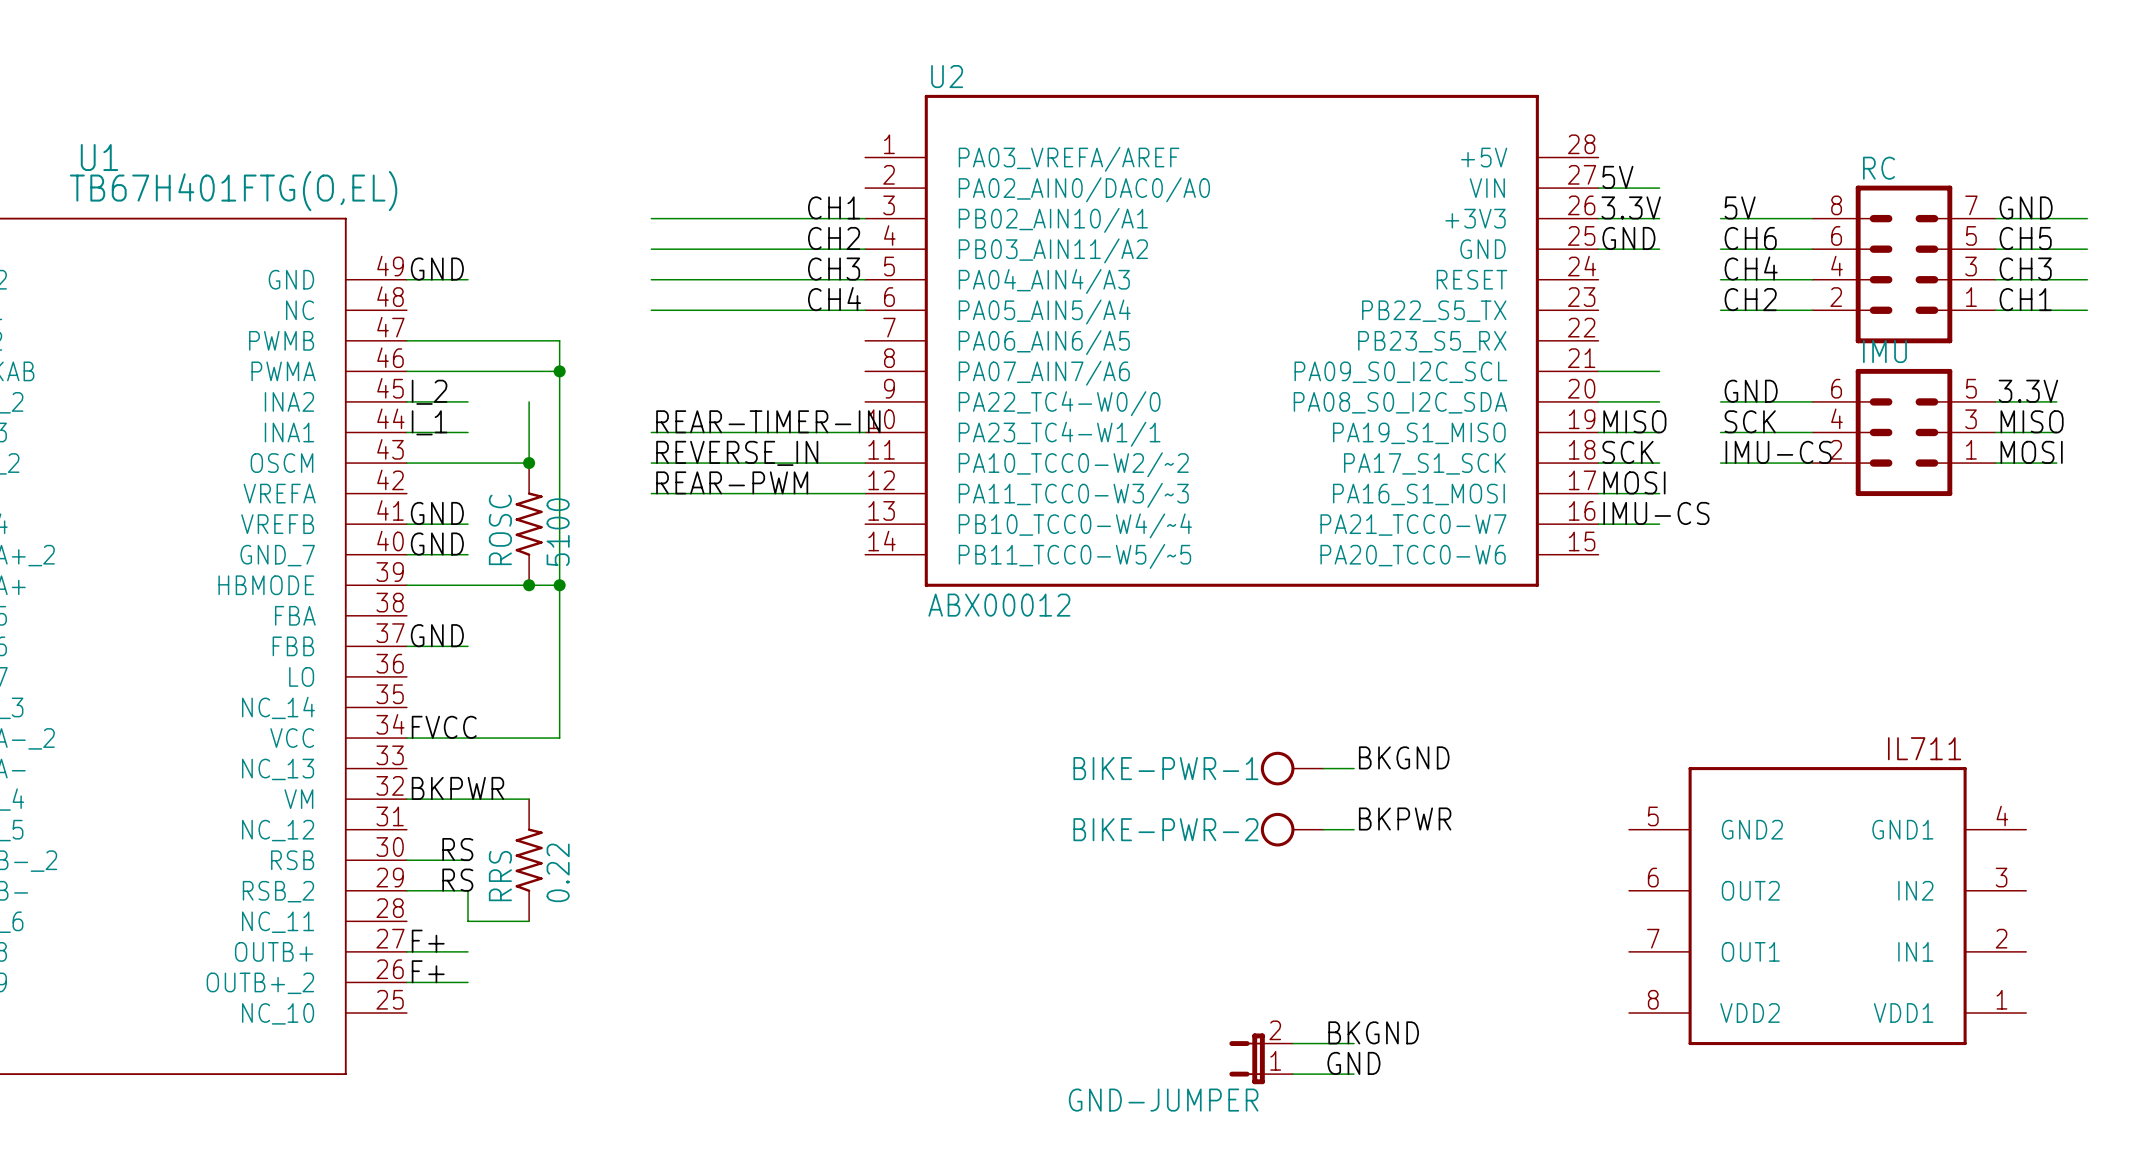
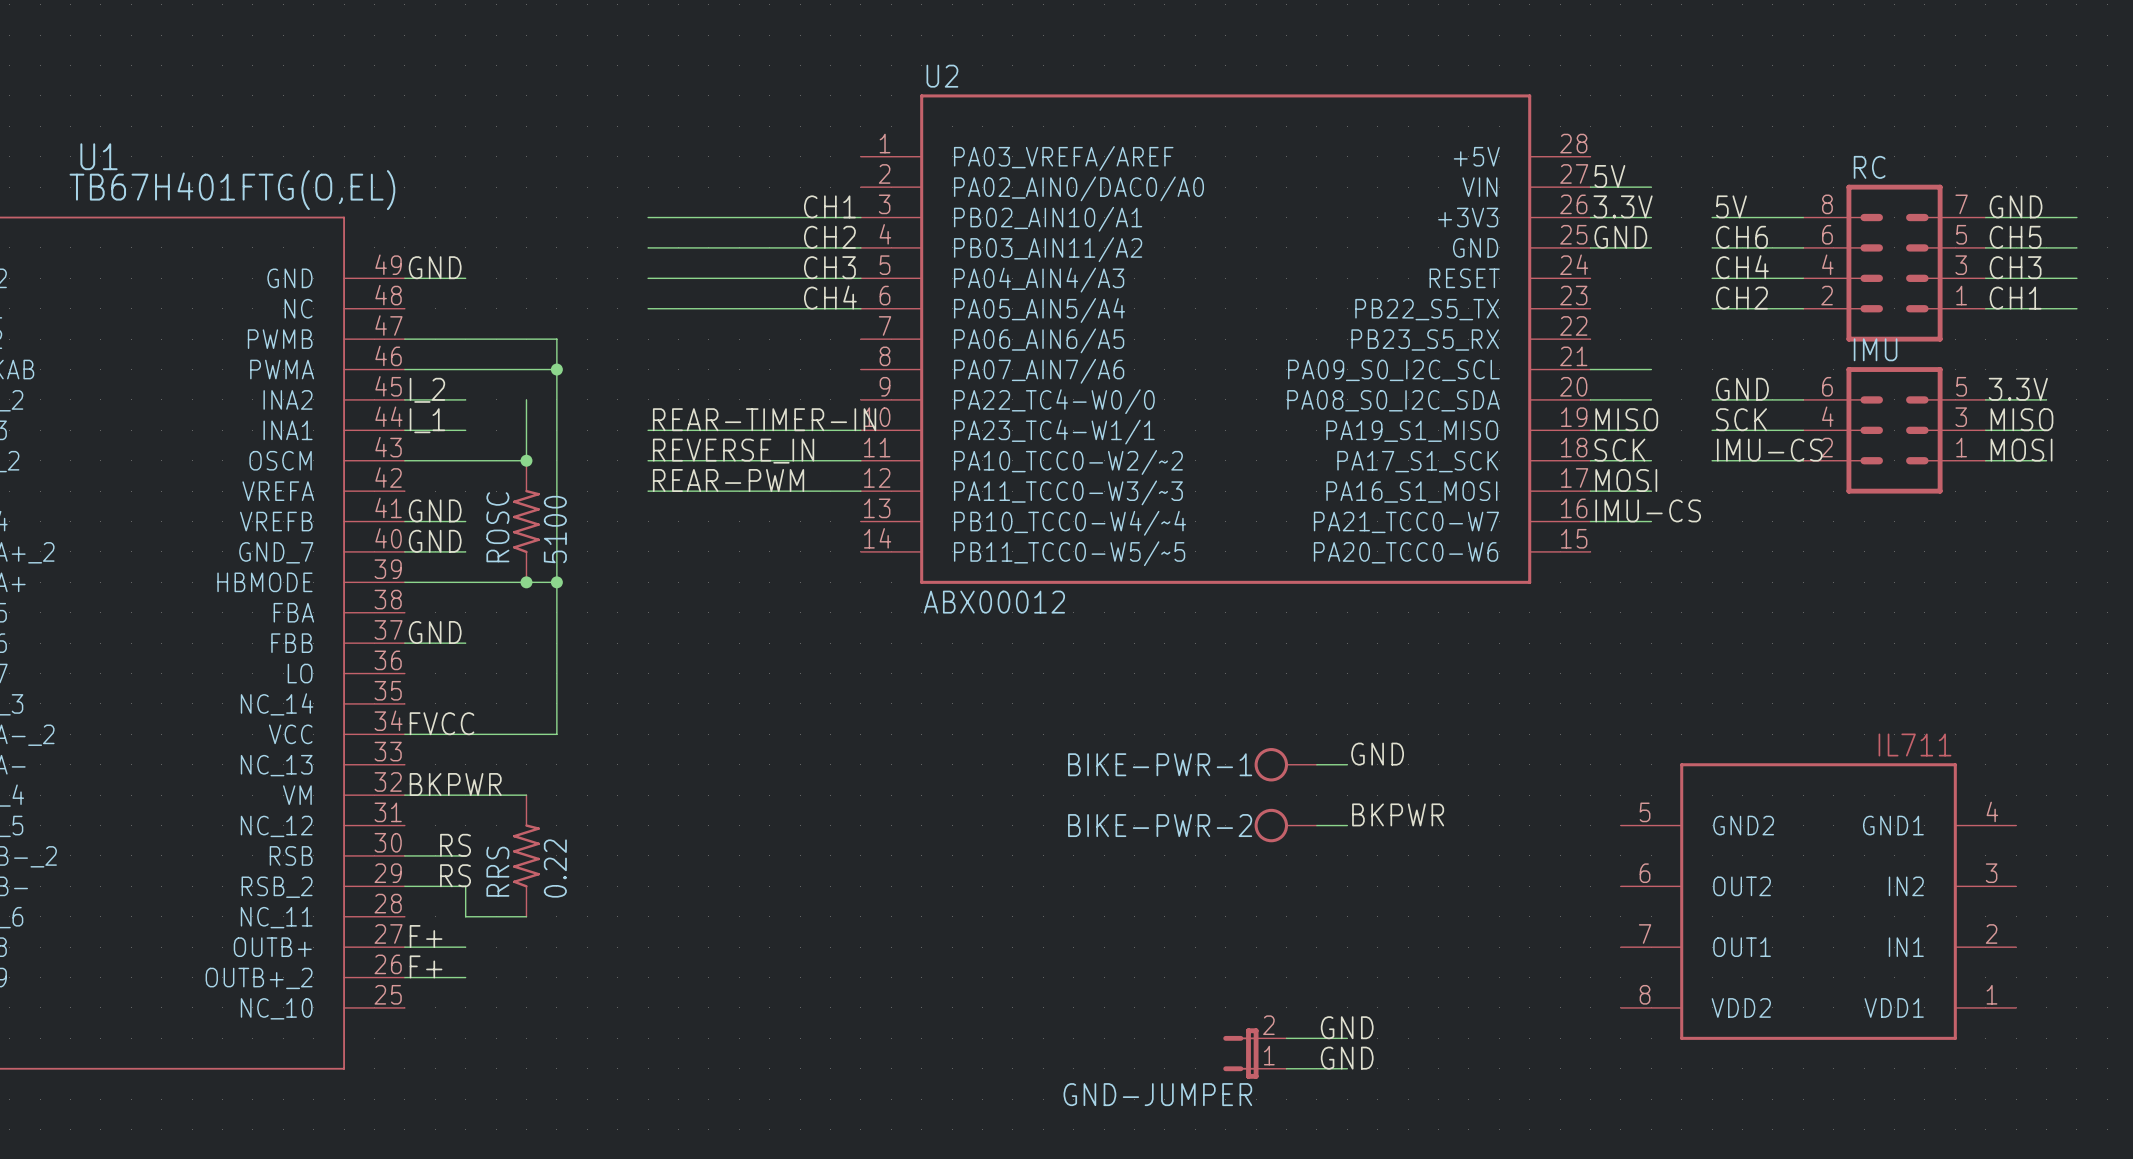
label: BKGND (1404, 757) -> GND (1377, 754)
label: BKGND (1373, 1032) -> GND (1347, 1027)

